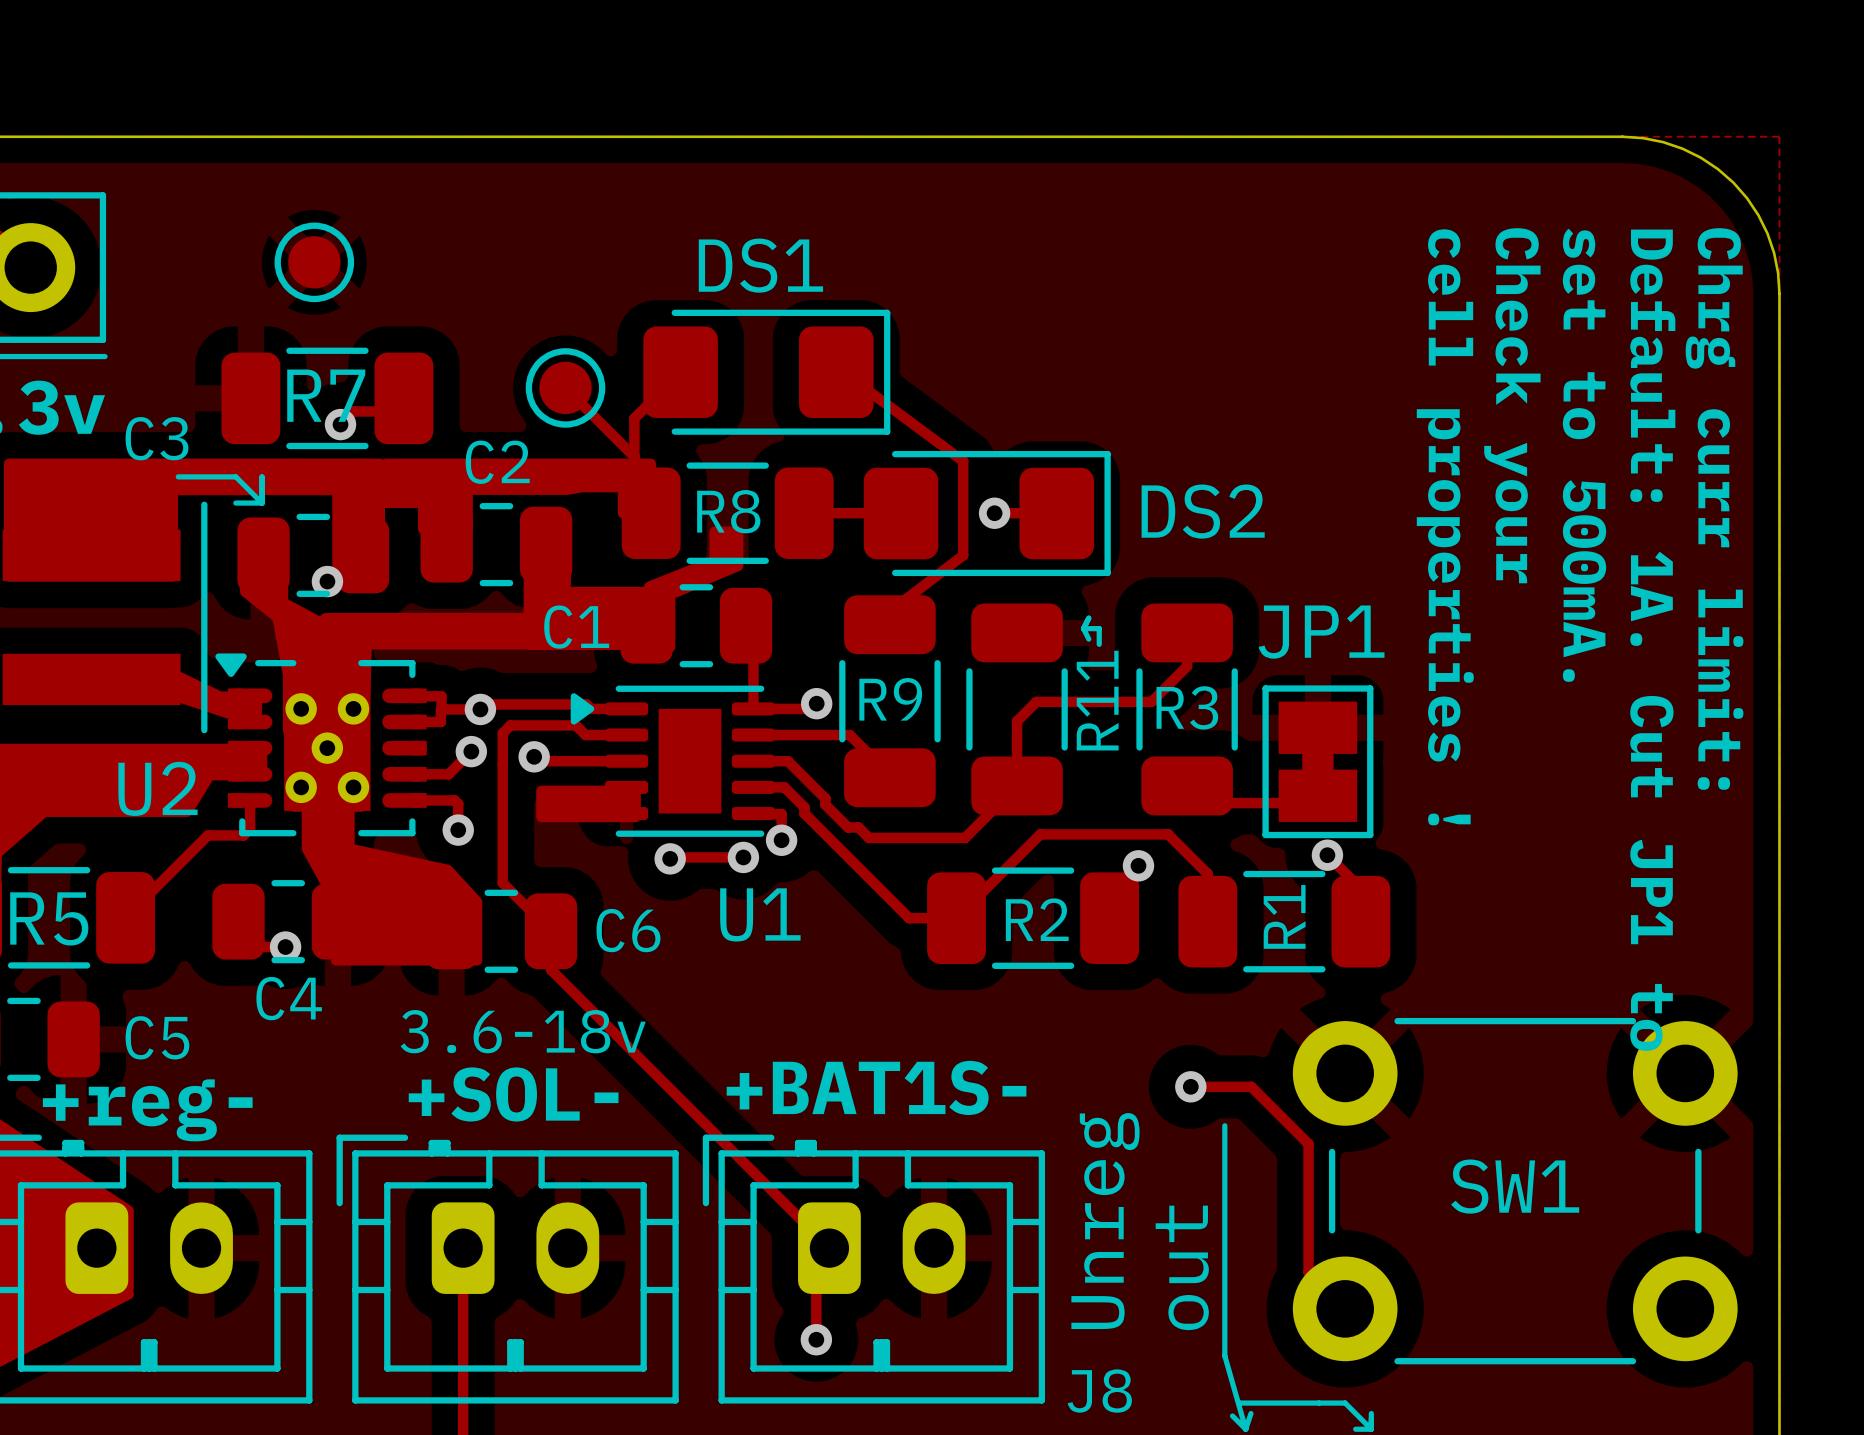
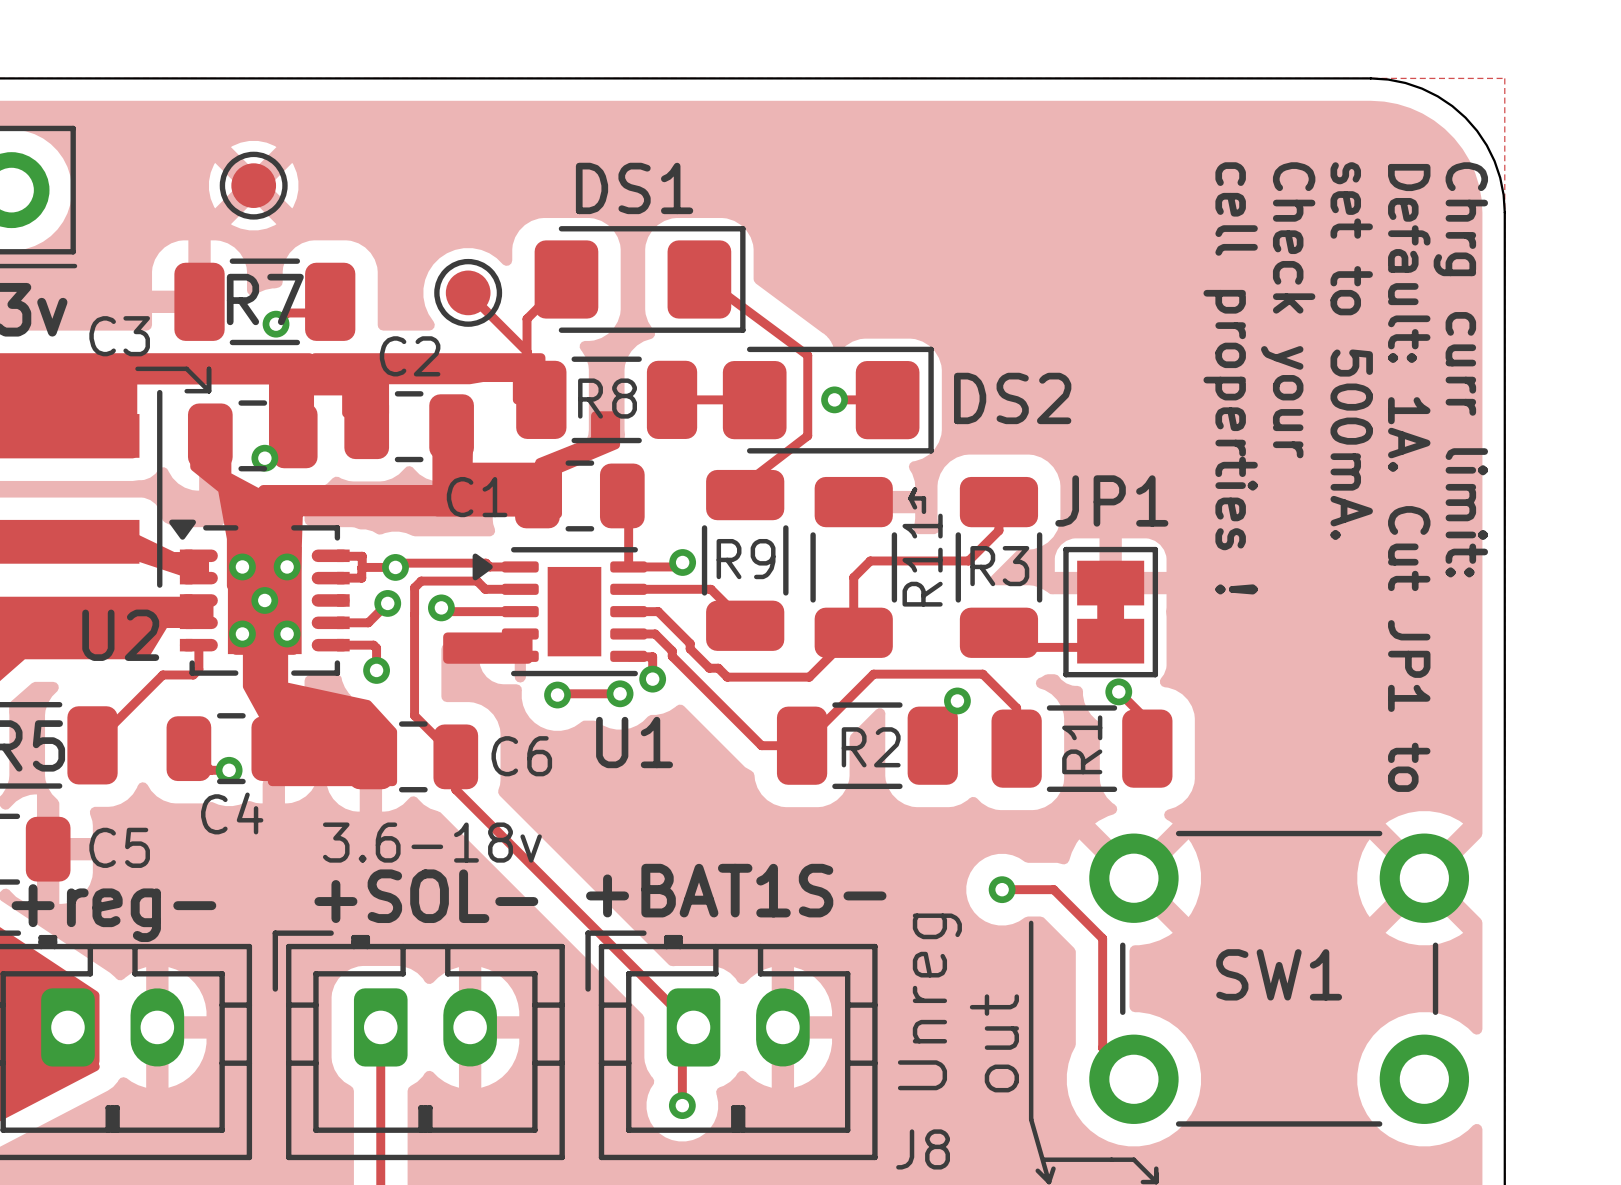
text position: Check your (1512, 405) -> Check your (1288, 310)
text position: set to 500mA. (1584, 455) -> set to 500mA. (1351, 351)
text position: Chrg curr limit: (1714, 508) -> Chrg curr limit: (1460, 369)
text position: cell properties ! (1445, 527) -> cell properties ! (1230, 378)
text position: Default: 1A. Cut JP1 to (1652, 640) -> Default: 1A. Cut JP1 to (1409, 477)

